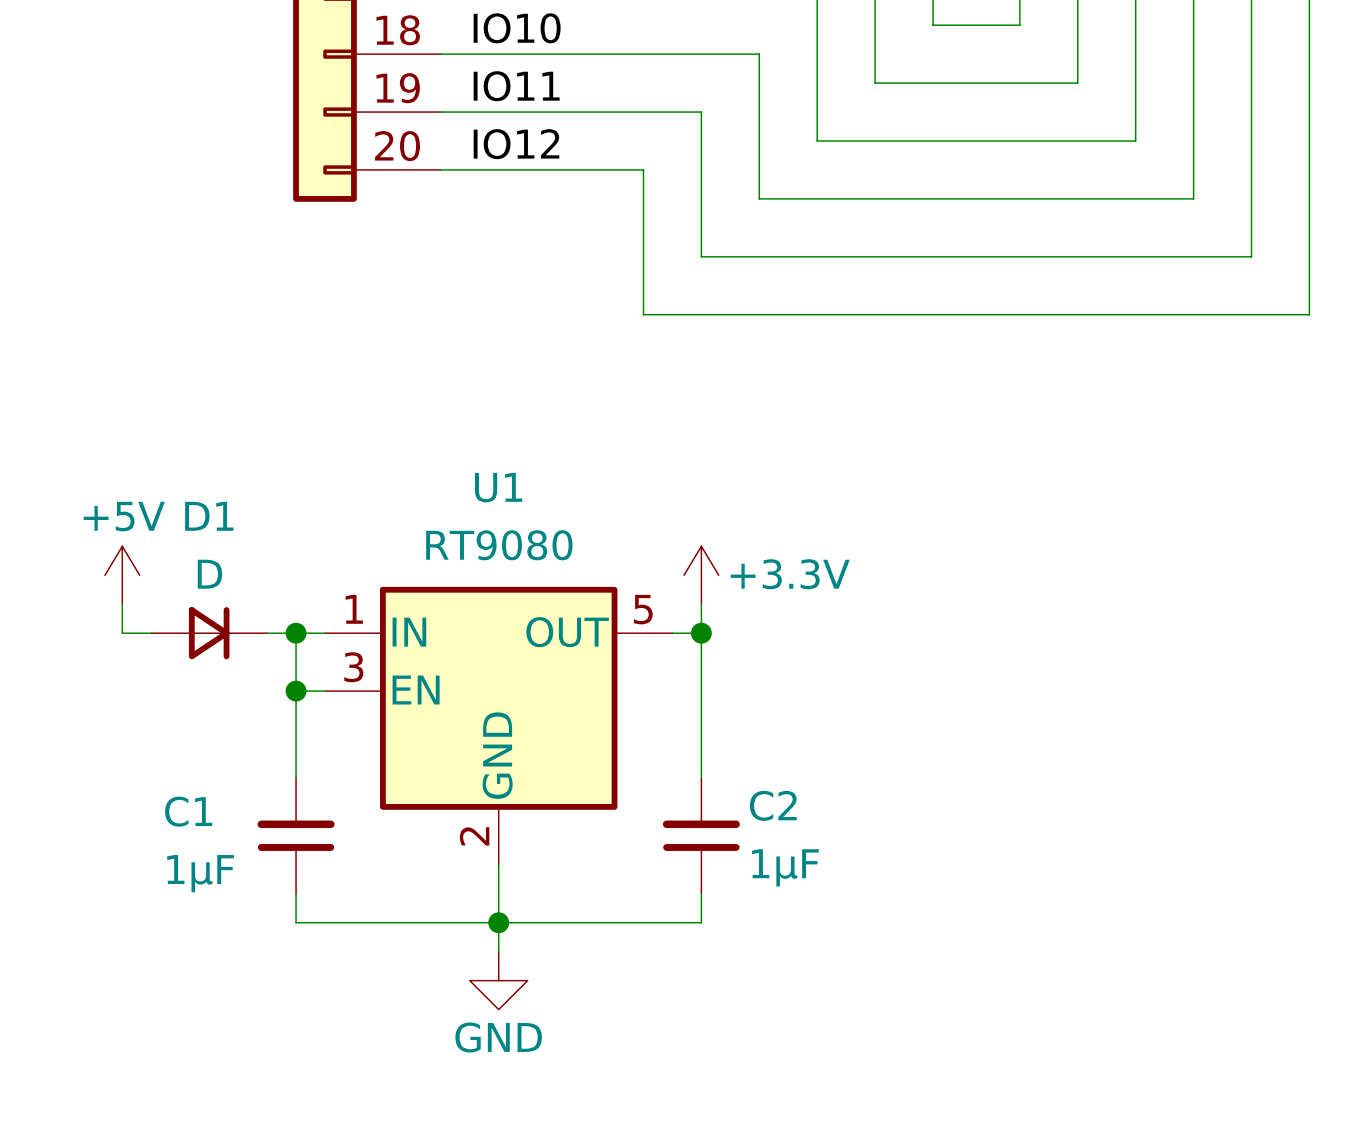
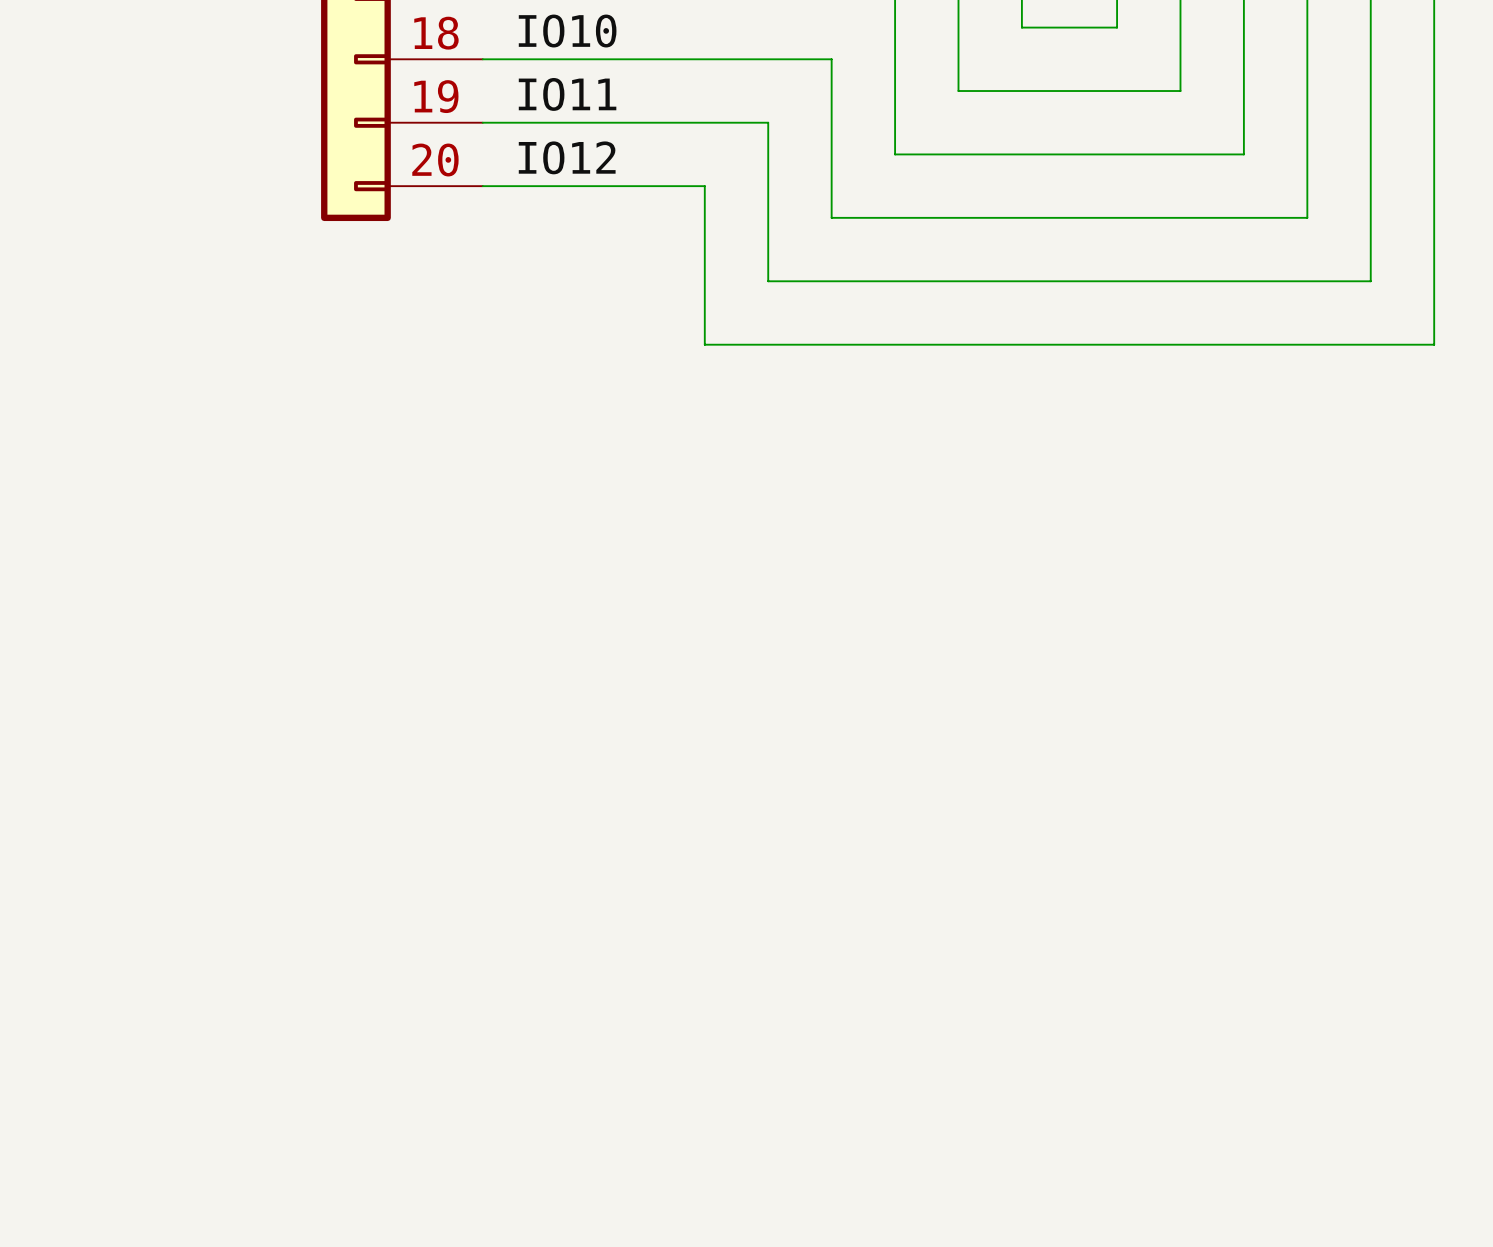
power symbol: +5V (122, 575) -> none
power symbol: +3.3V (701, 575) -> none
wire: (122, 604) (122, 633) (151, 633) -> none
wire: (701, 604) (701, 777) -> none
D1: D (209, 633) -> none
wire: (267, 633) (324, 633) -> none
wire: (296, 633) (296, 777) -> none
junction: (296, 633) -> none
wire: (672, 633) (701, 633) -> none
junction: (701, 633) -> none
wire: (296, 691) (324, 691) -> none
junction: (296, 691) -> none
U1: RT9080 (498, 725) -> none
C1: 1µF (296, 835) -> none
C2: 1µF (701, 835) -> none
wire: (498, 864) (498, 951) -> none
wire: (296, 893) (296, 922) (701, 922) (701, 893) -> none
junction: (498, 922) -> none
power symbol: GND (498, 980) -> none

